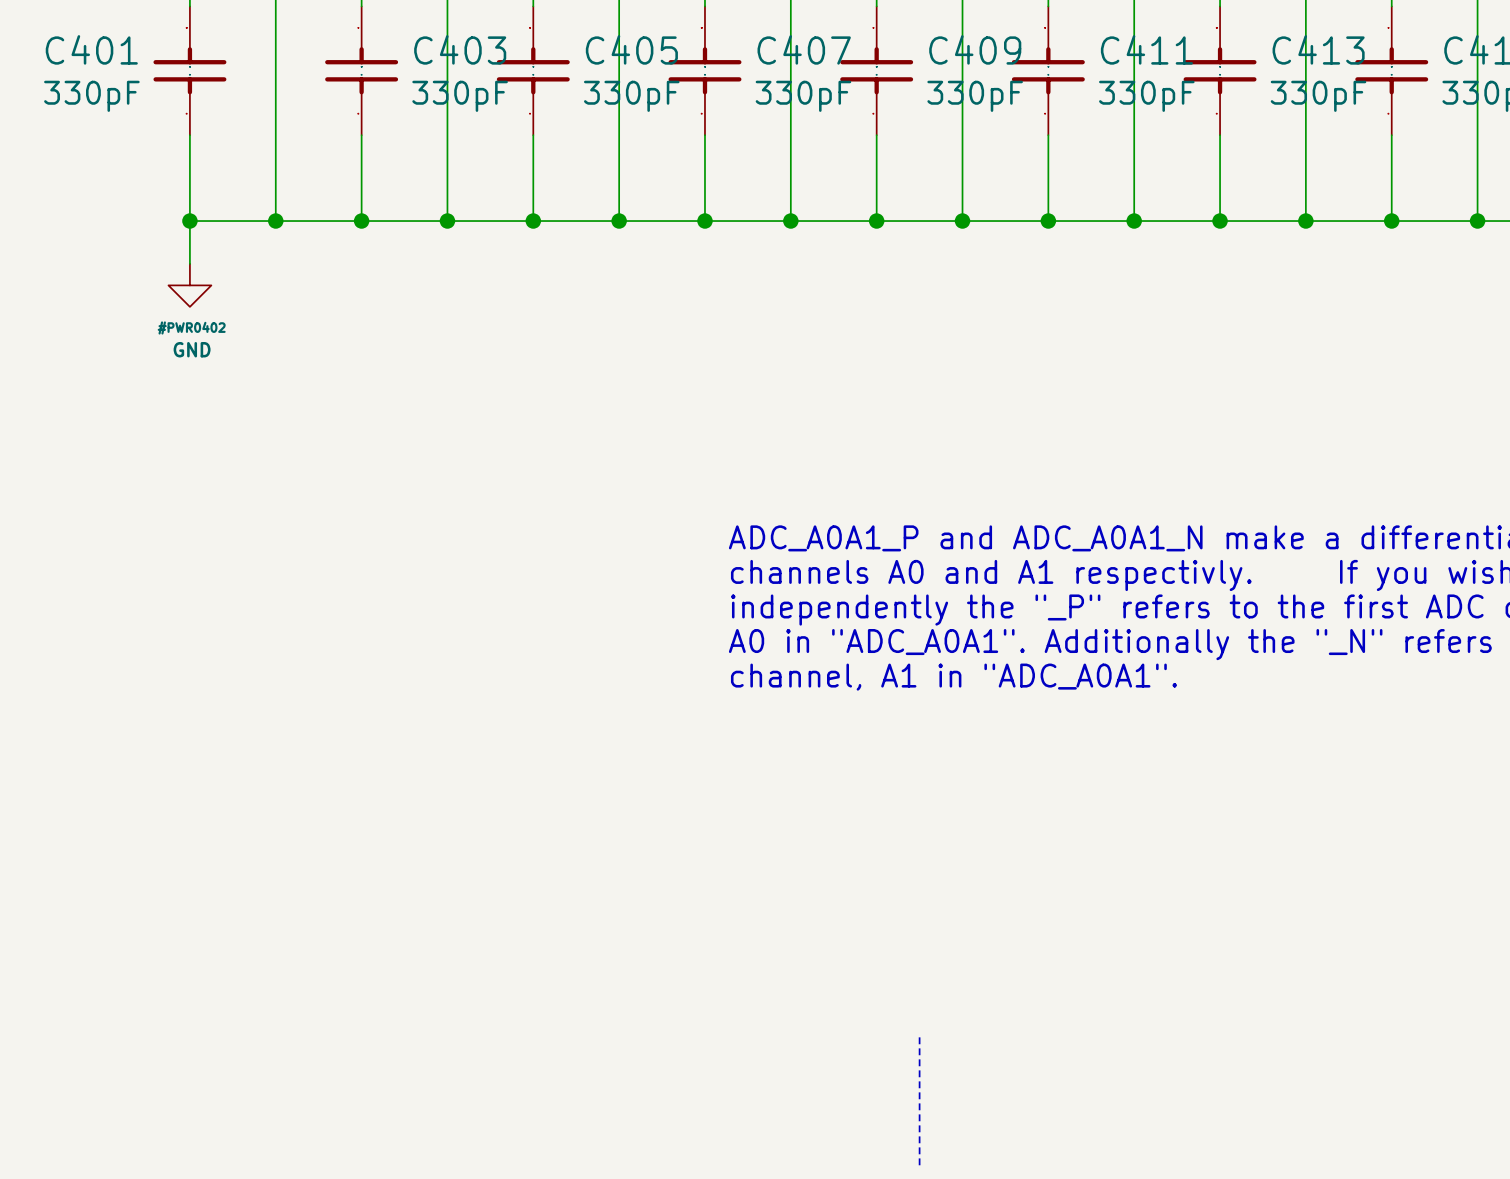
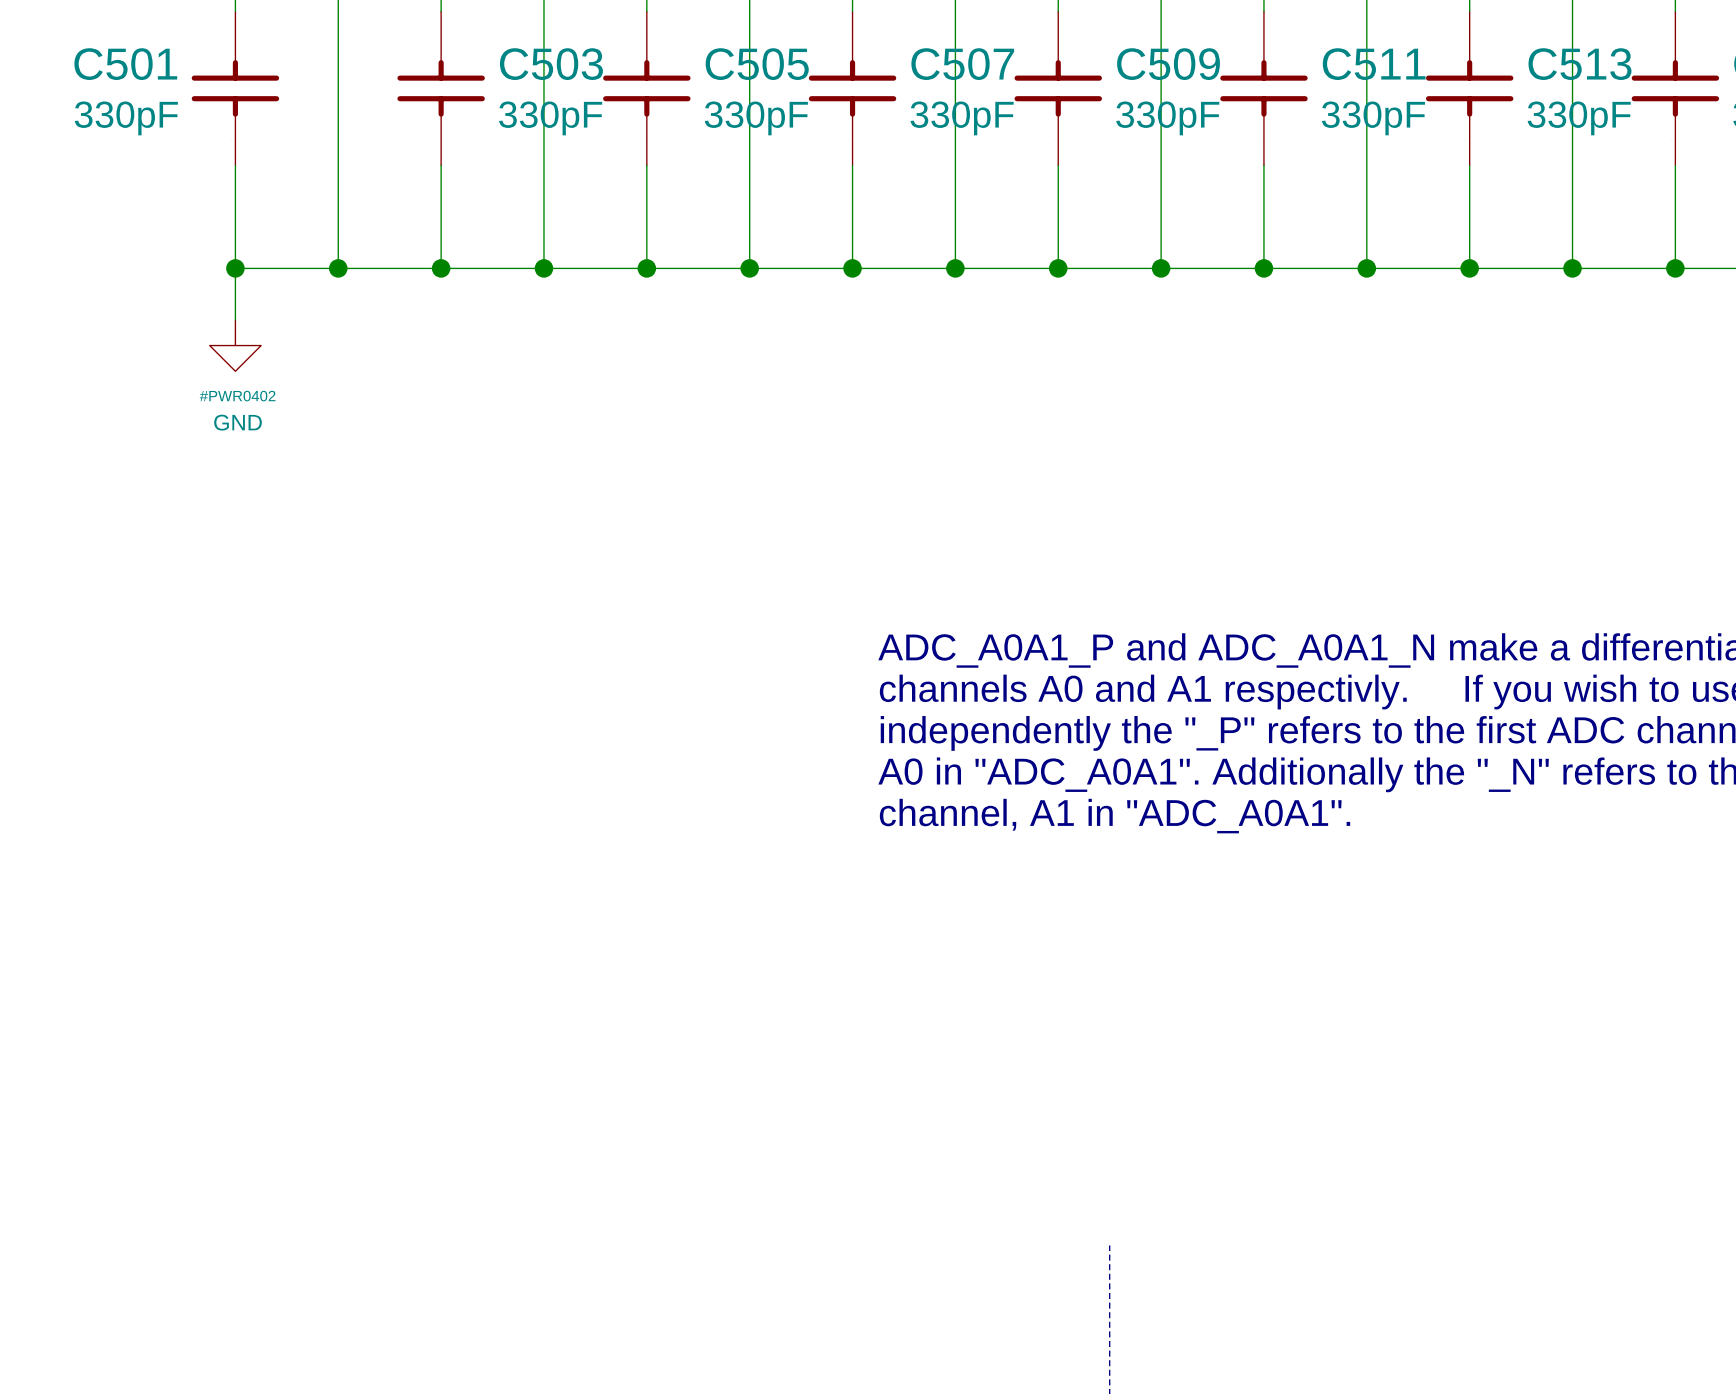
C401 name: C401 (91, 49) -> C501 (125, 64)
C403 name: C403 (460, 49) -> C503 (551, 64)
C405 name: C405 (631, 49) -> C505 (757, 64)
C407 name: C407 (804, 49) -> C507 (962, 64)
C409 name: C409 (975, 49) -> C509 (1168, 64)
C411 name: C411 (1146, 49) -> C511 (1374, 64)
C413 name: C413 (1318, 49) -> C513 (1580, 64)

